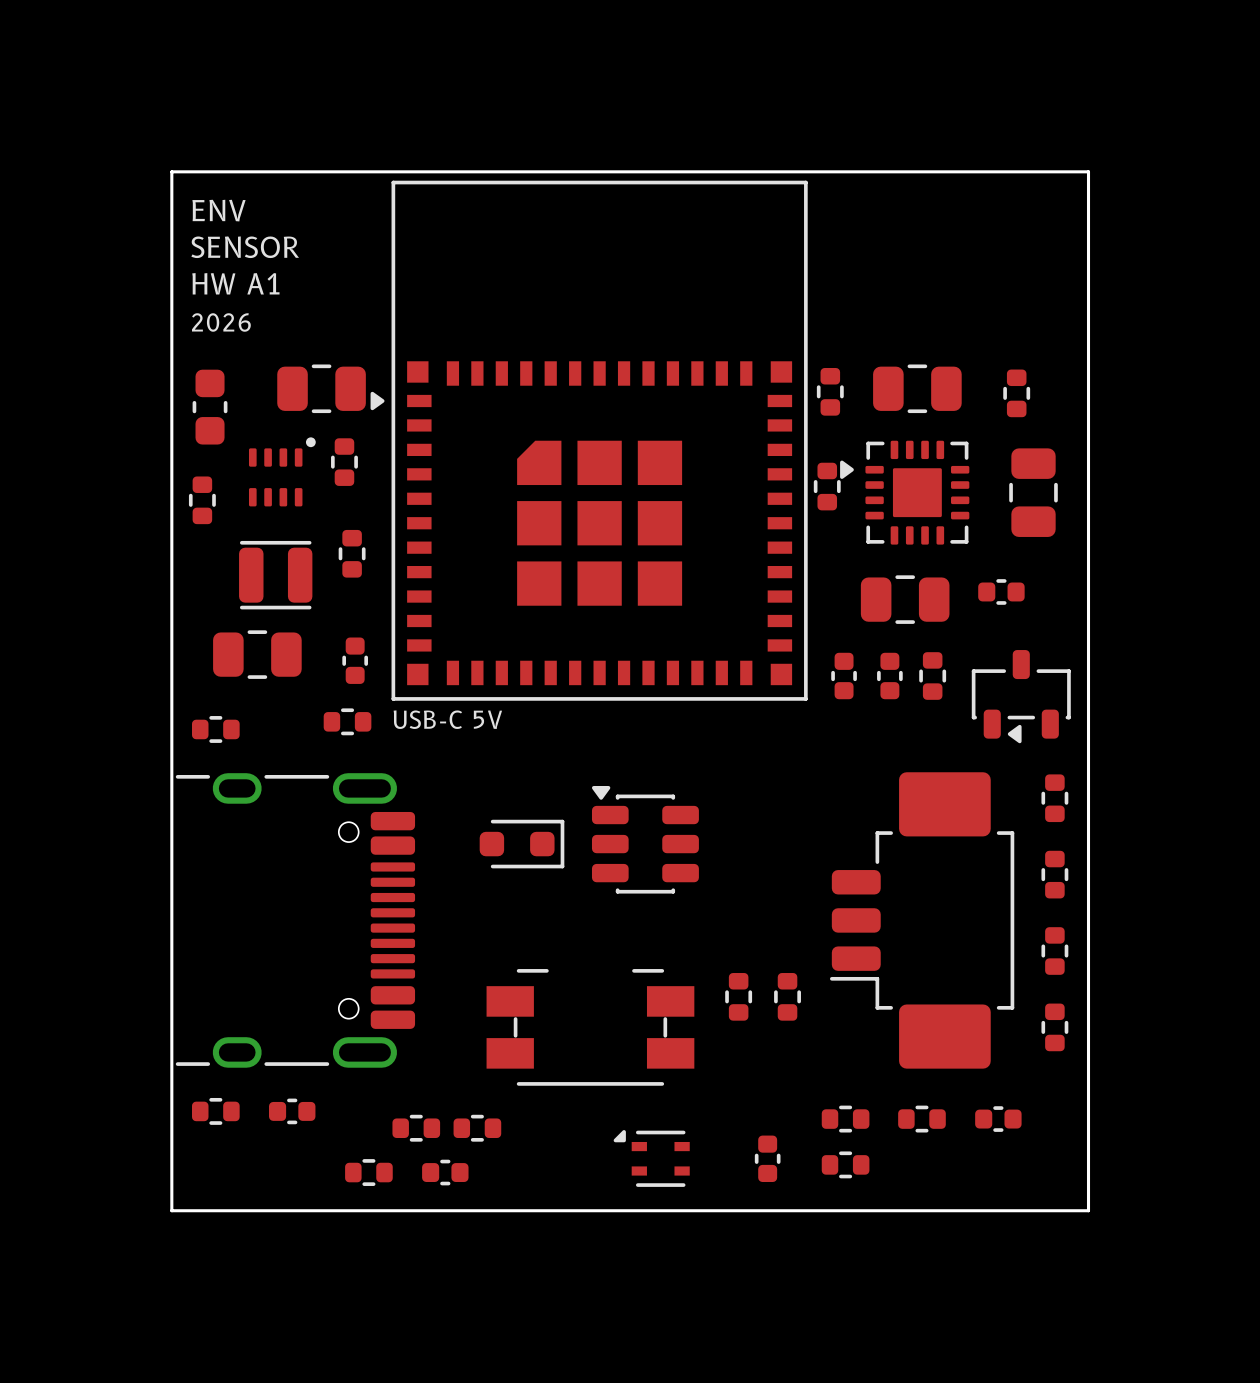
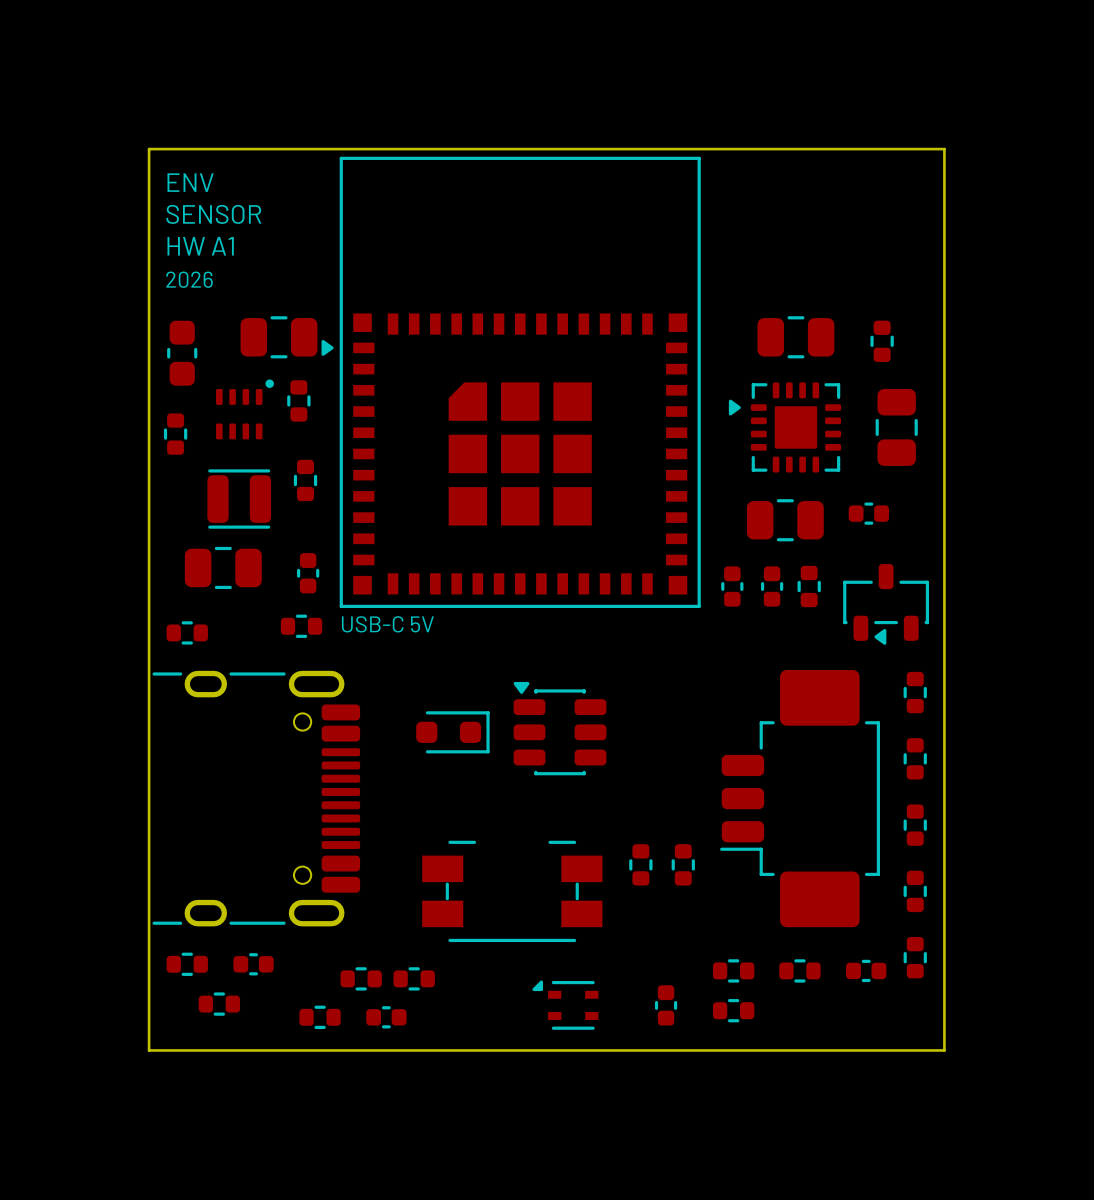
part: (830, 391) -> none
part: (827, 486) -> none
part: none -> (915, 957)
part: none -> (219, 1004)

